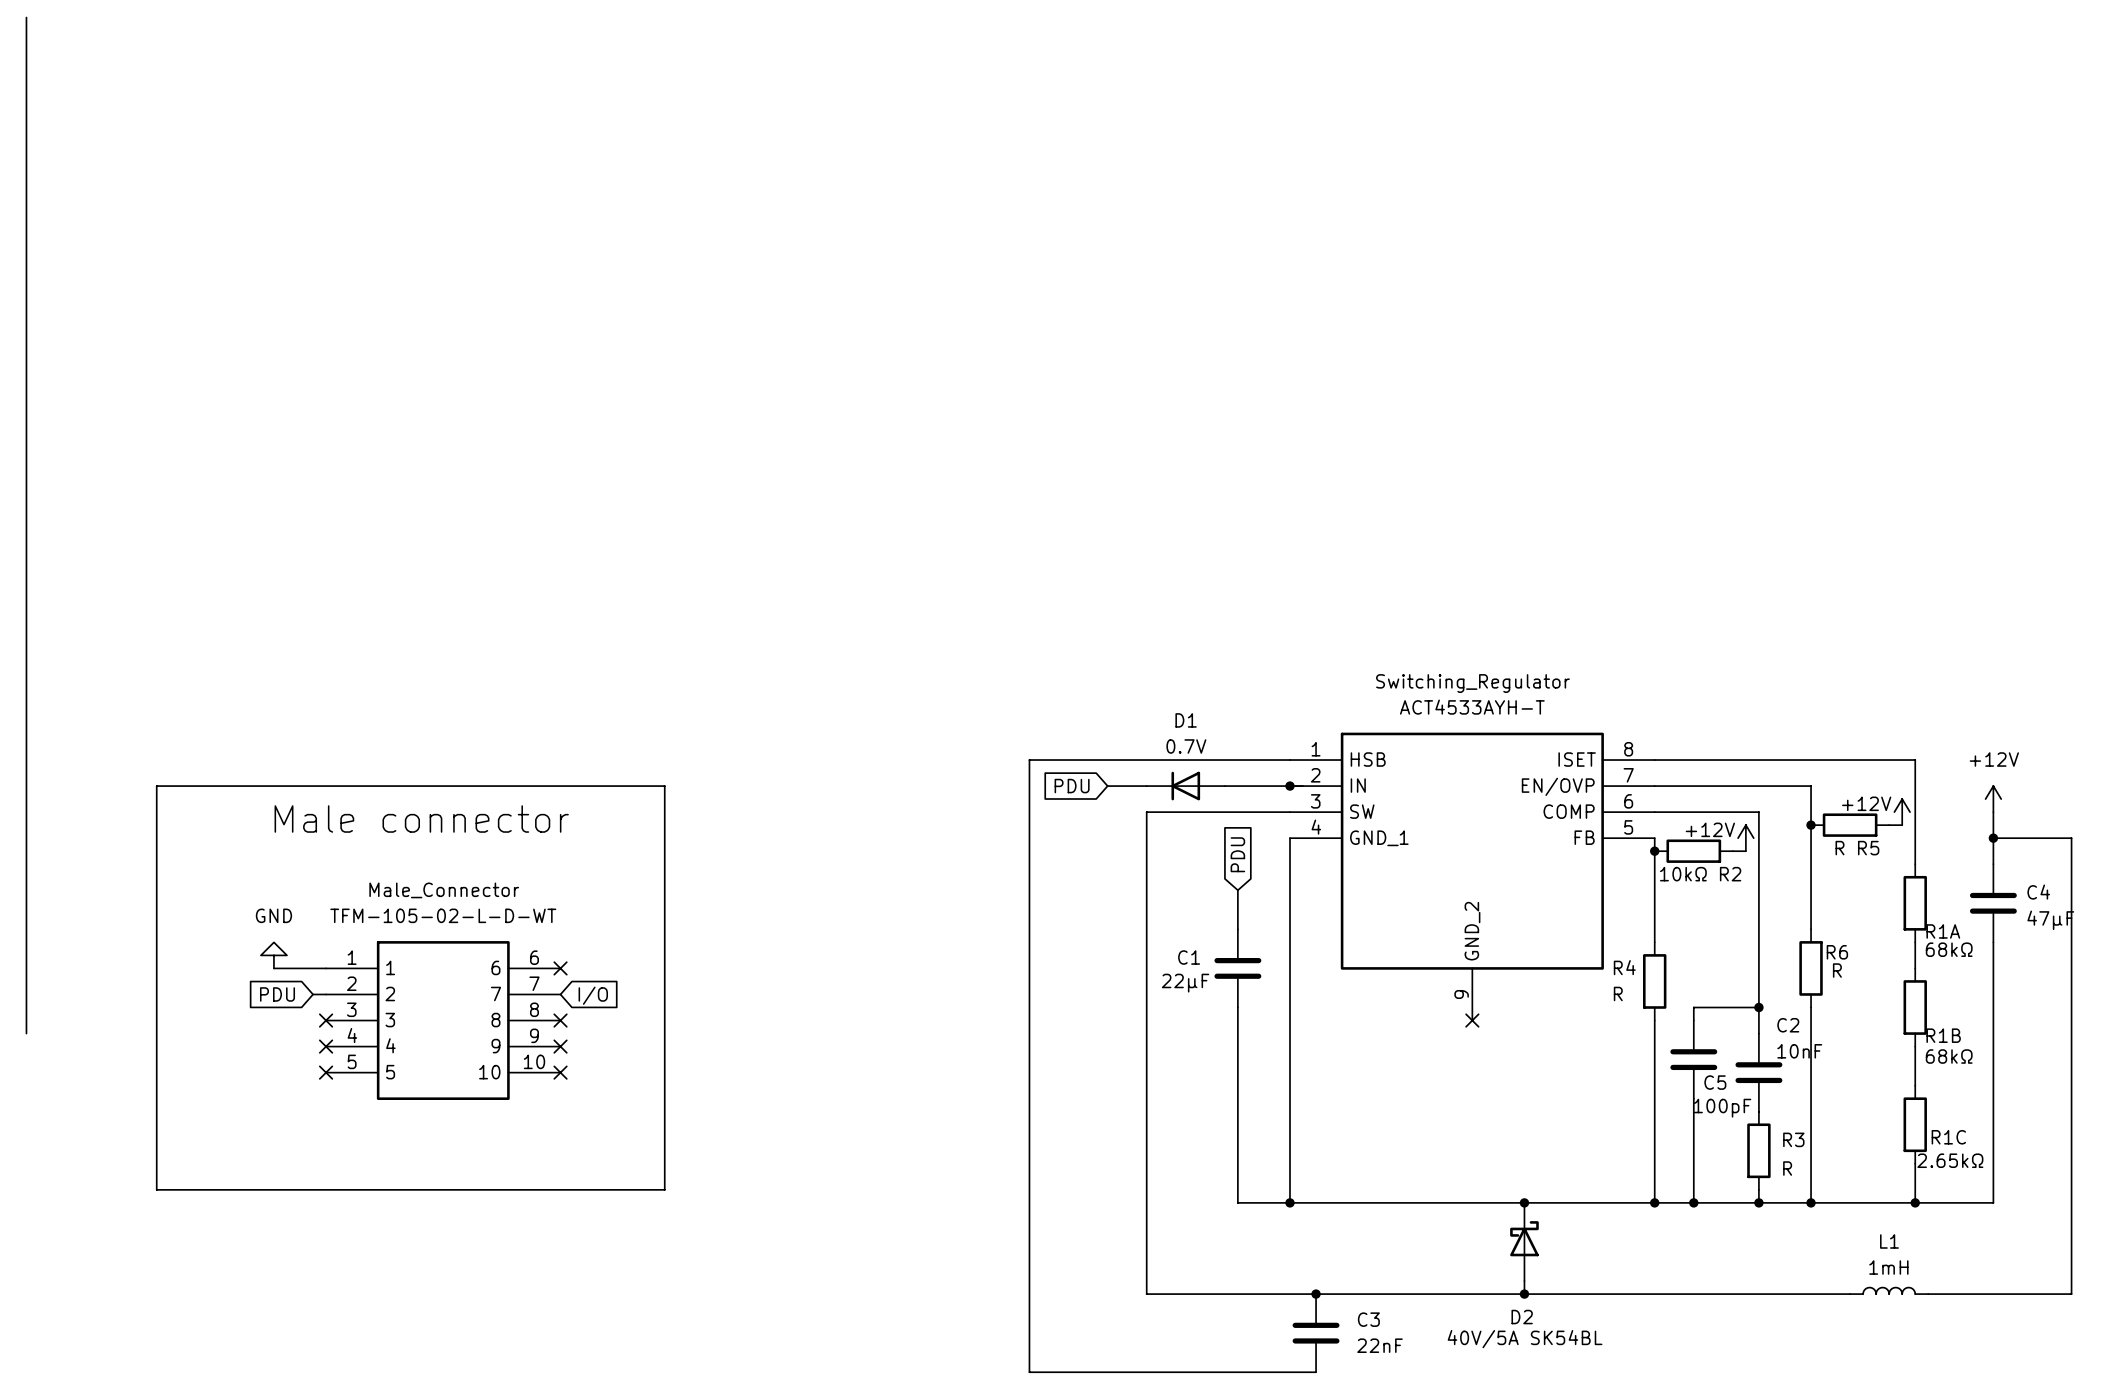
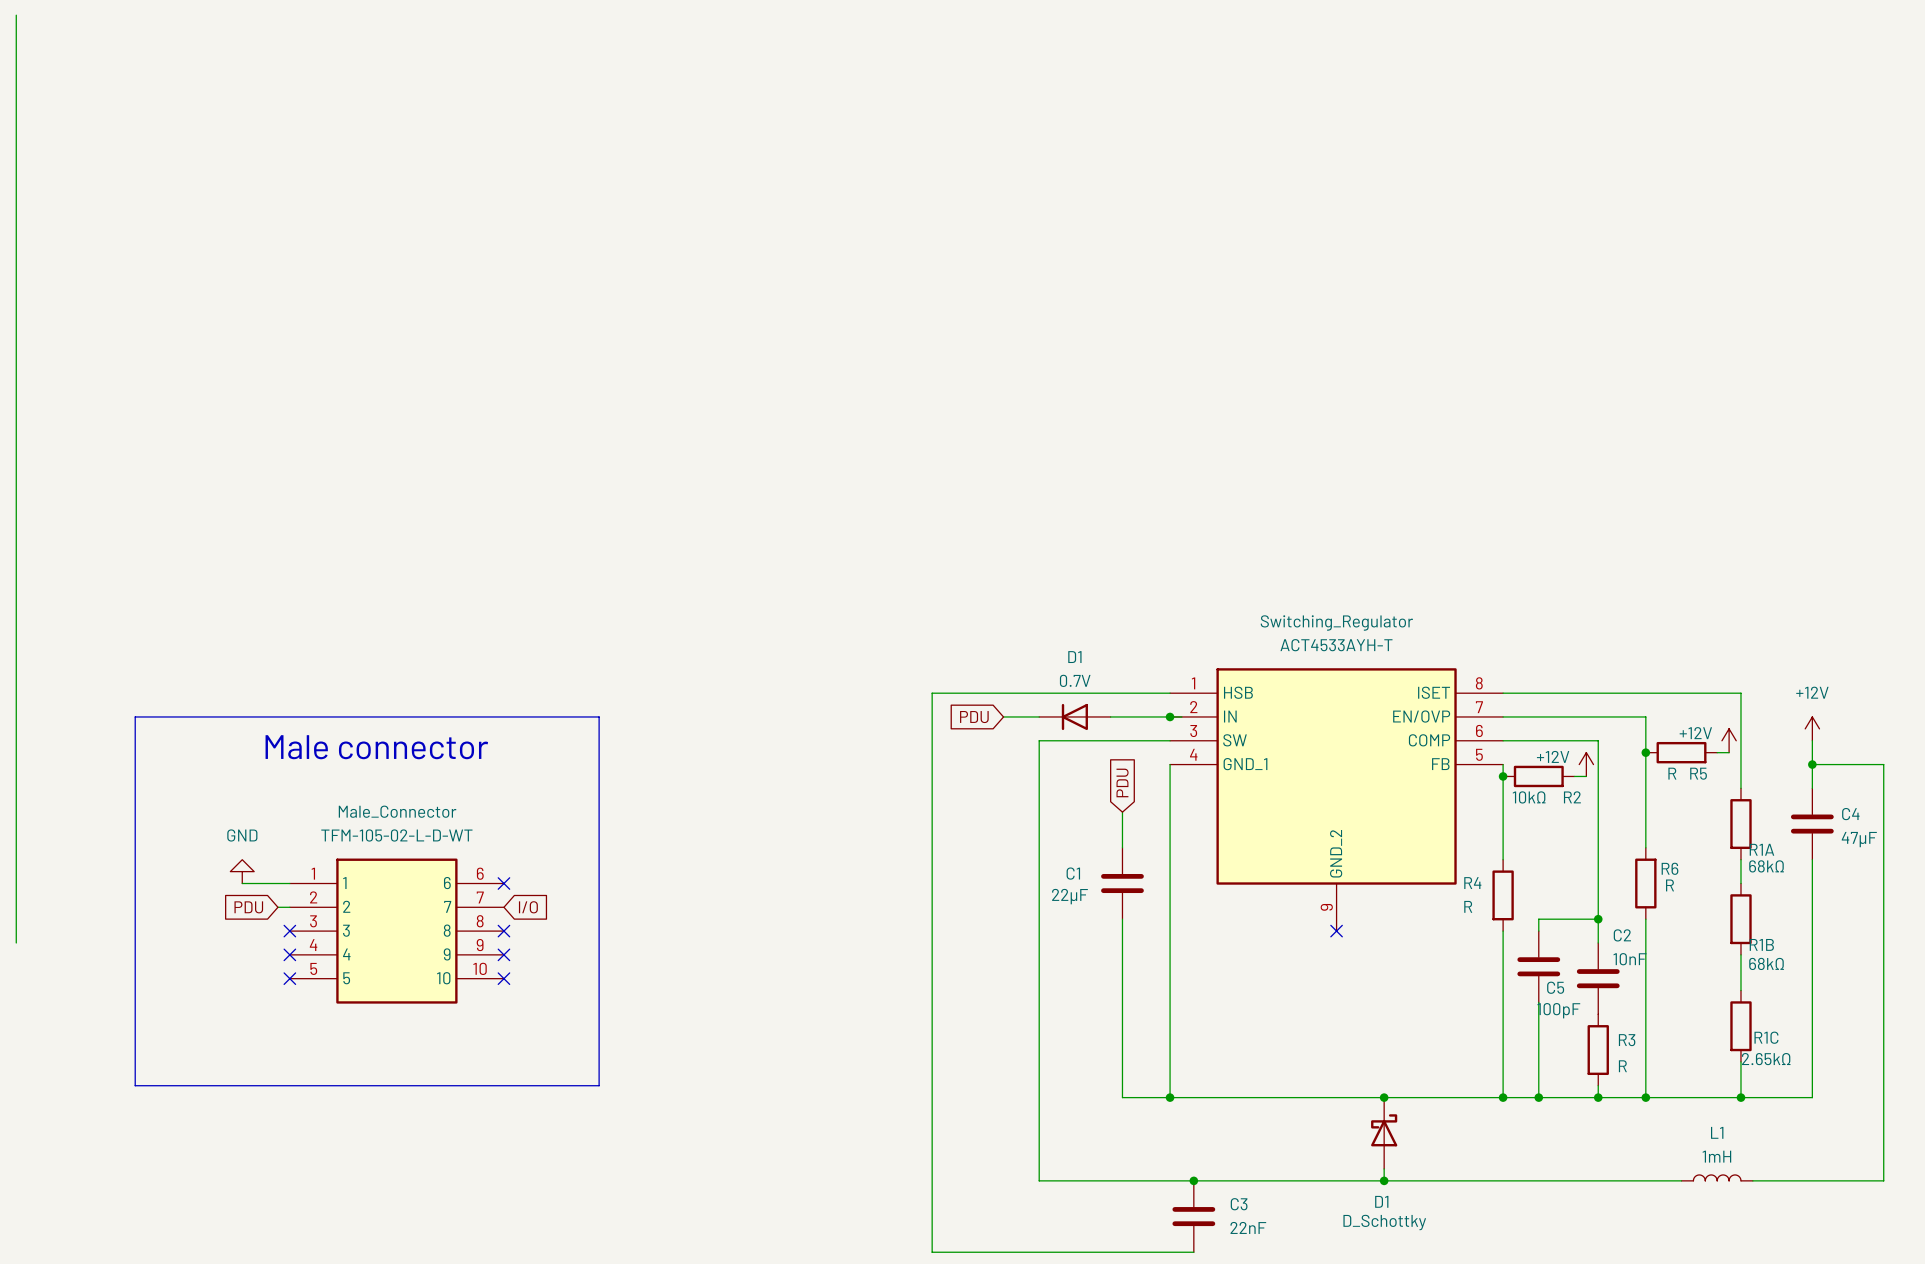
D2 name: D2 (1522, 1317) -> D1 (1381, 1201)
D2 value: 40V/5A SK54BL (1525, 1339) -> D_Schottky (1384, 1222)

